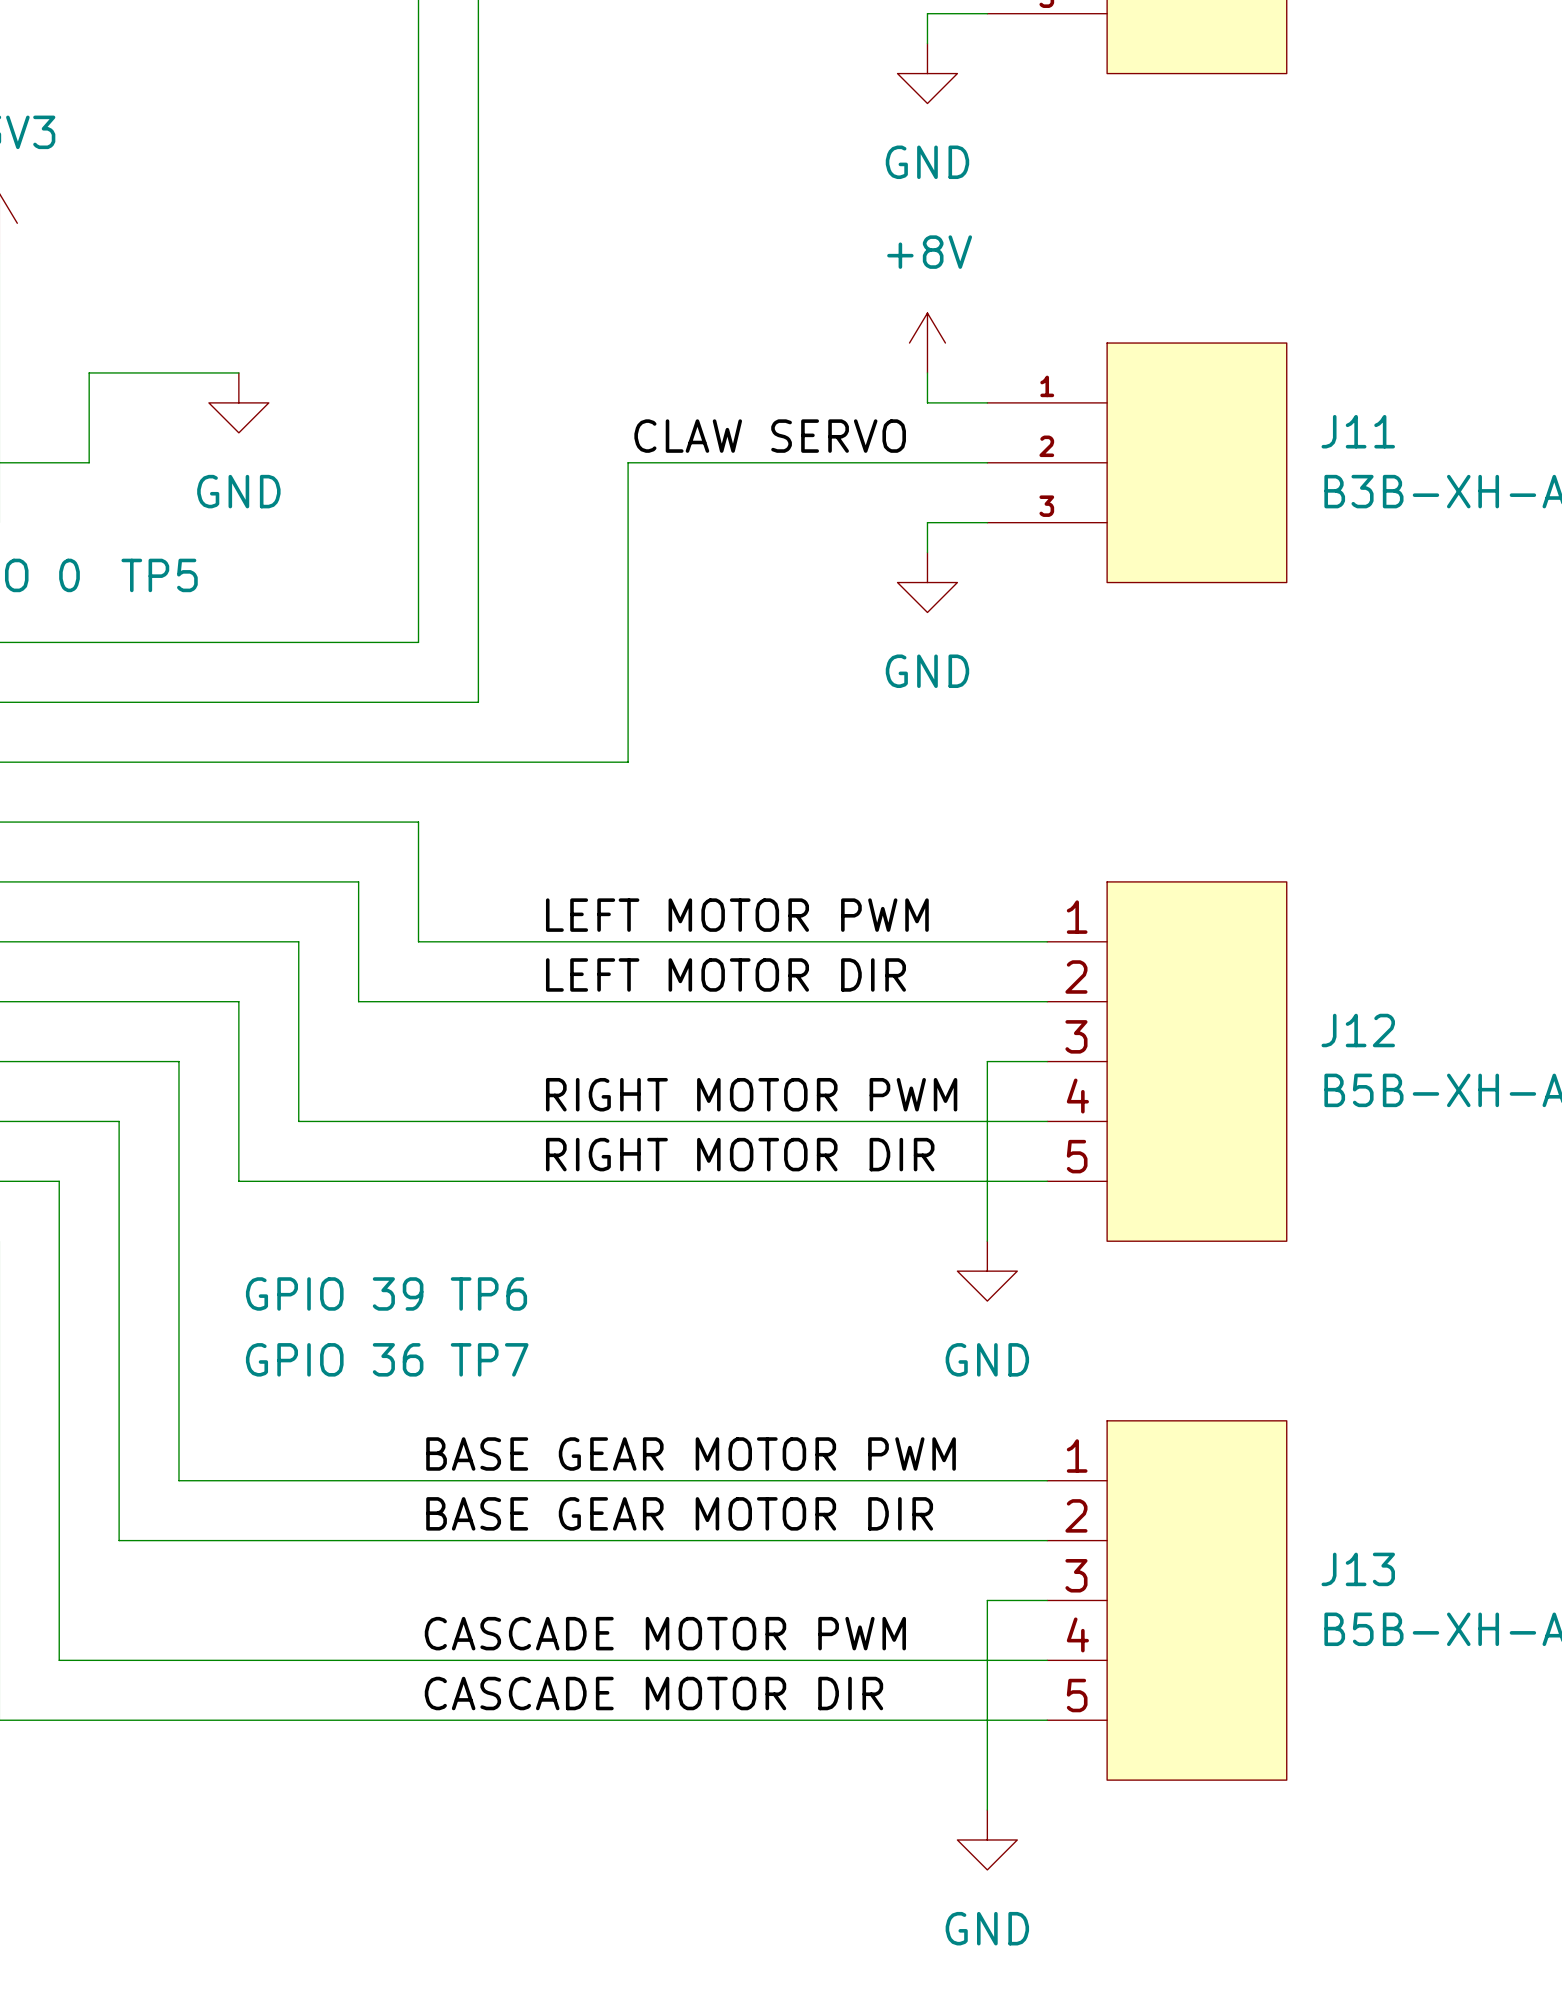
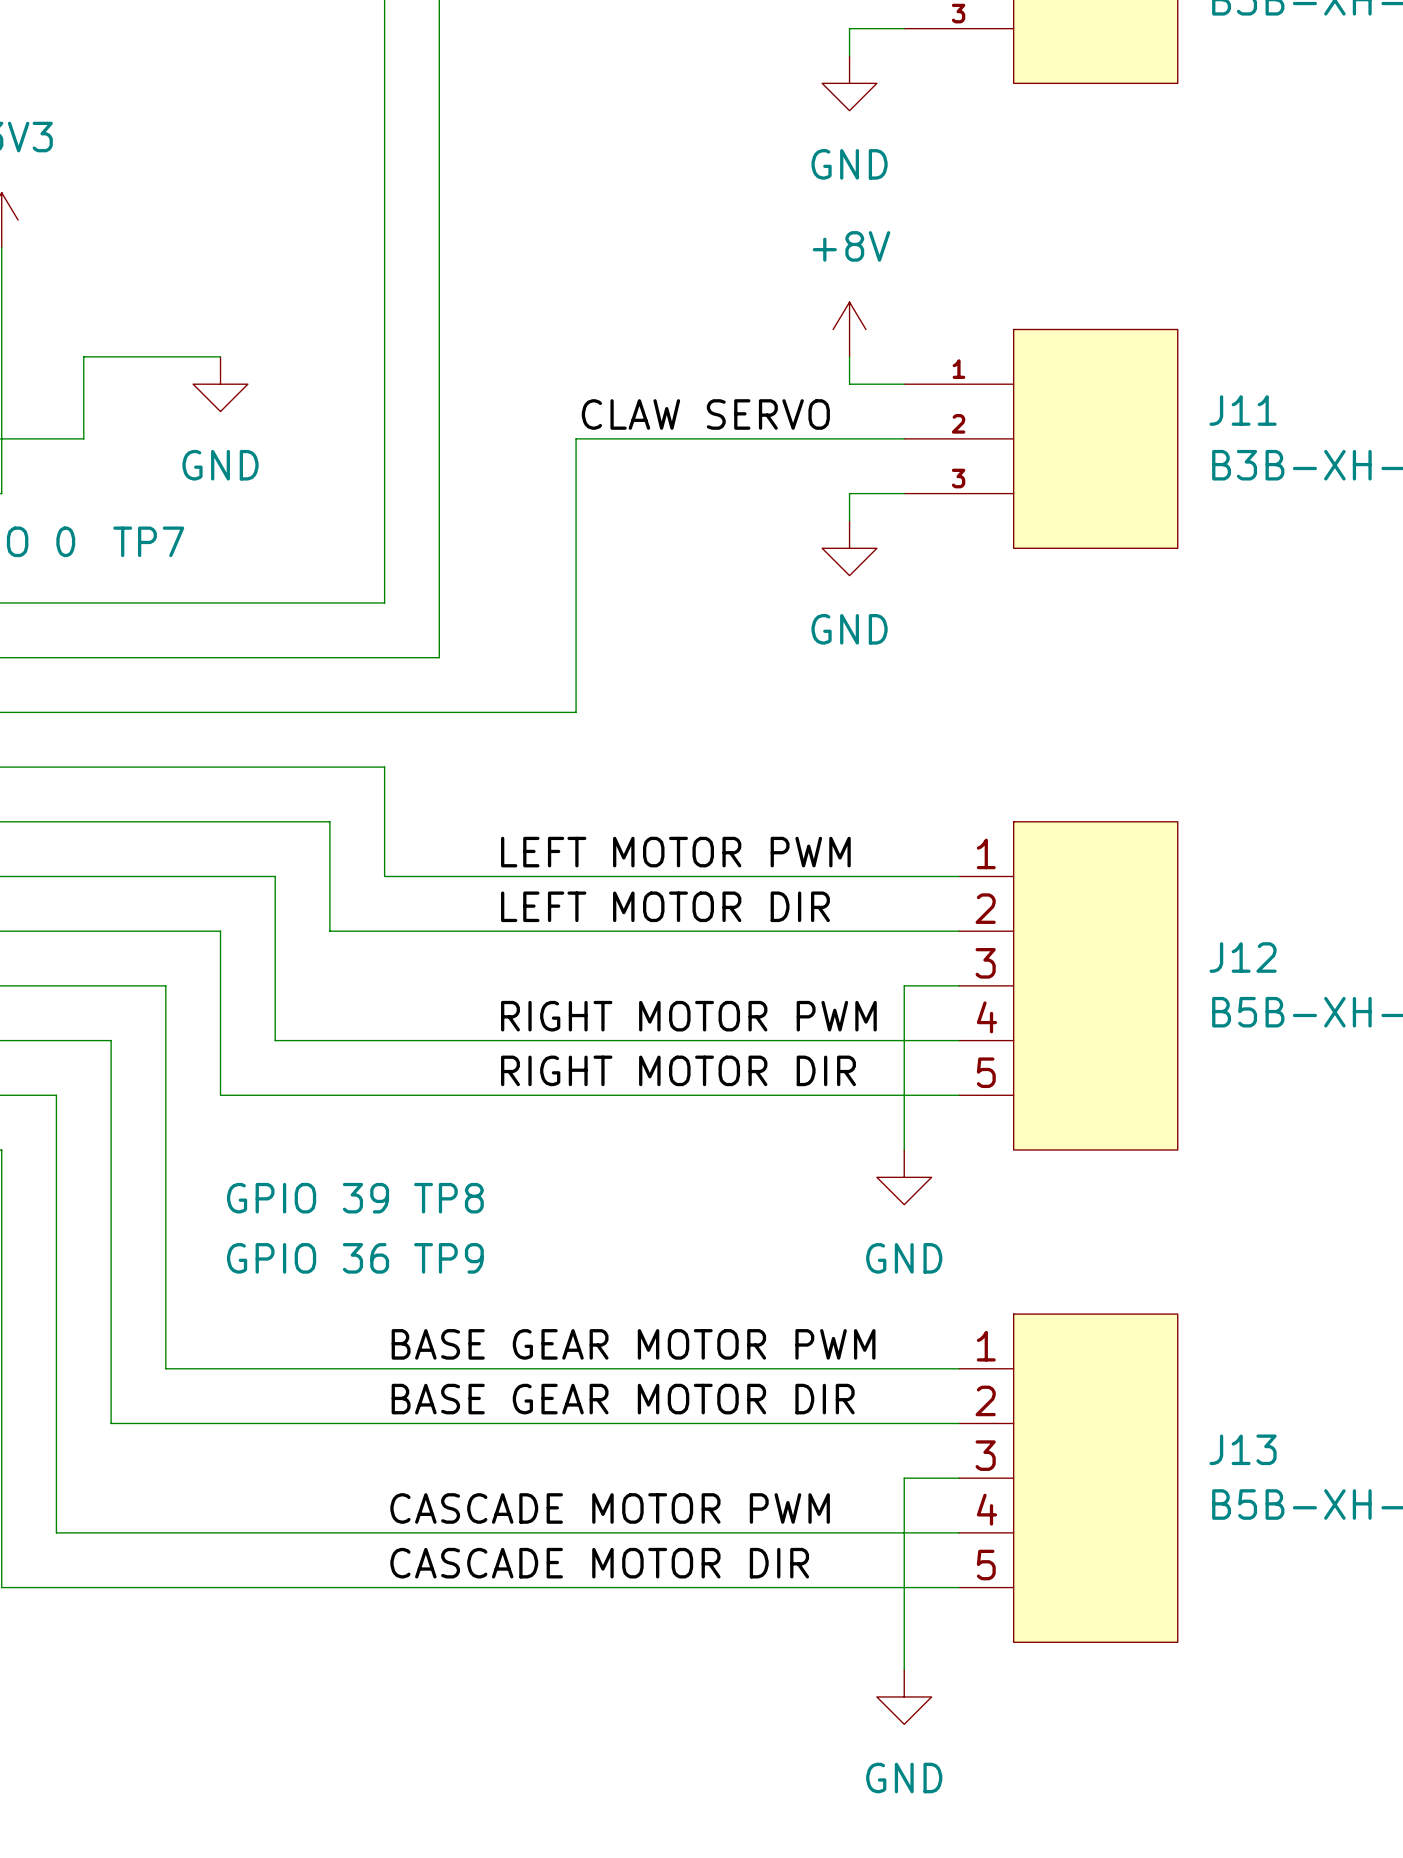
TP5 name: TP5 (159, 575) -> TP7 (148, 541)
TP6 name: TP6 (488, 1293) -> TP8 (448, 1198)
TP7 name: TP7 (489, 1359) -> TP9 (448, 1258)

